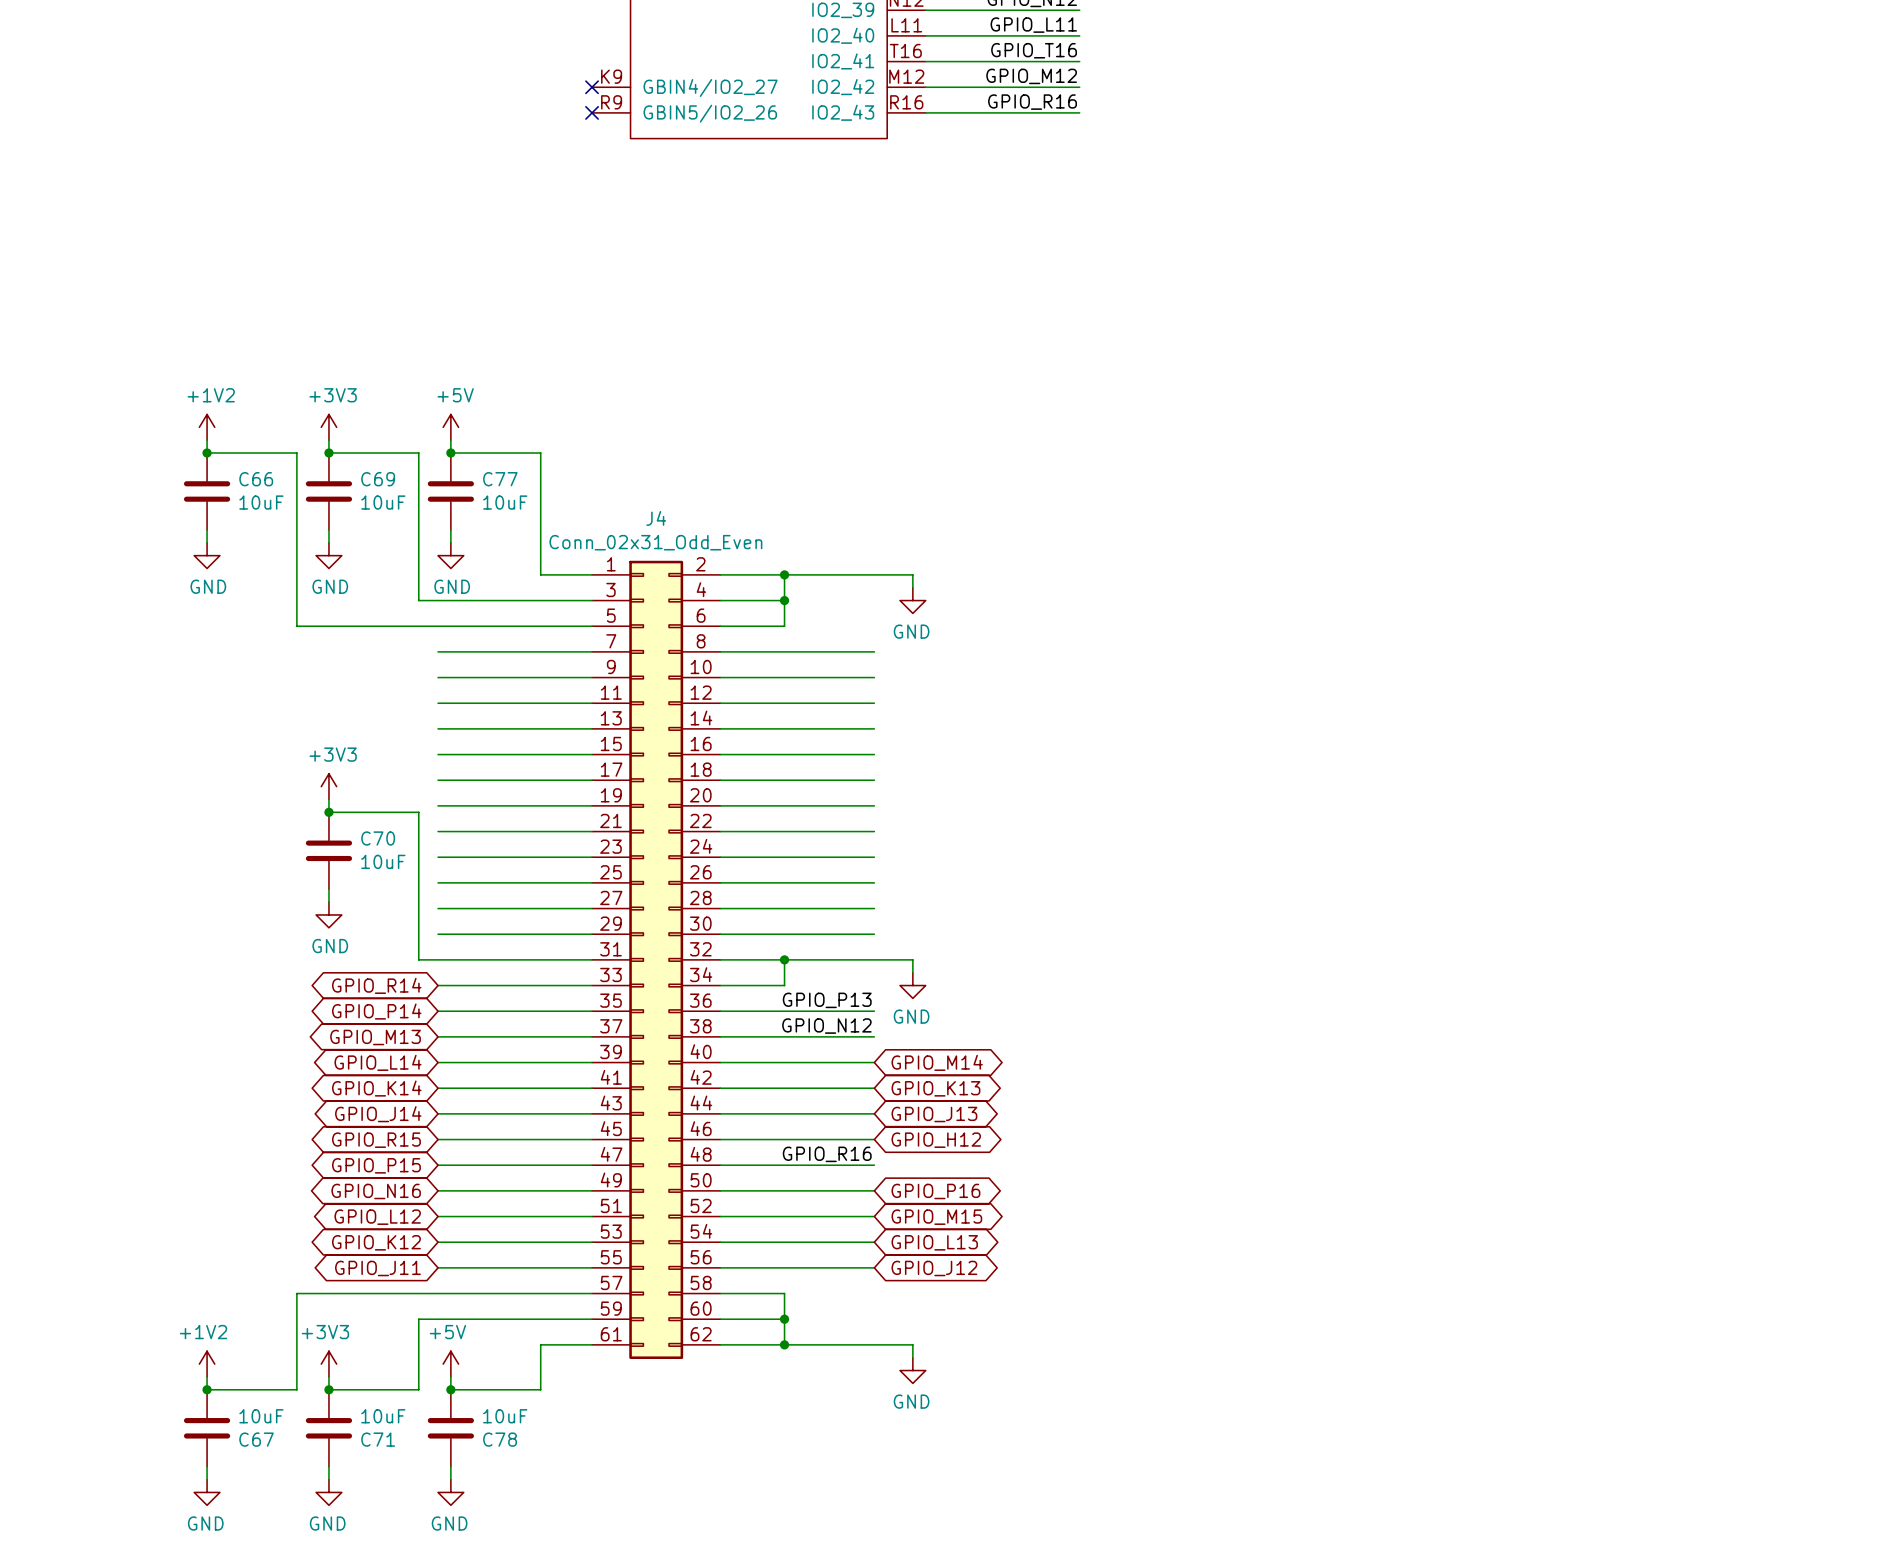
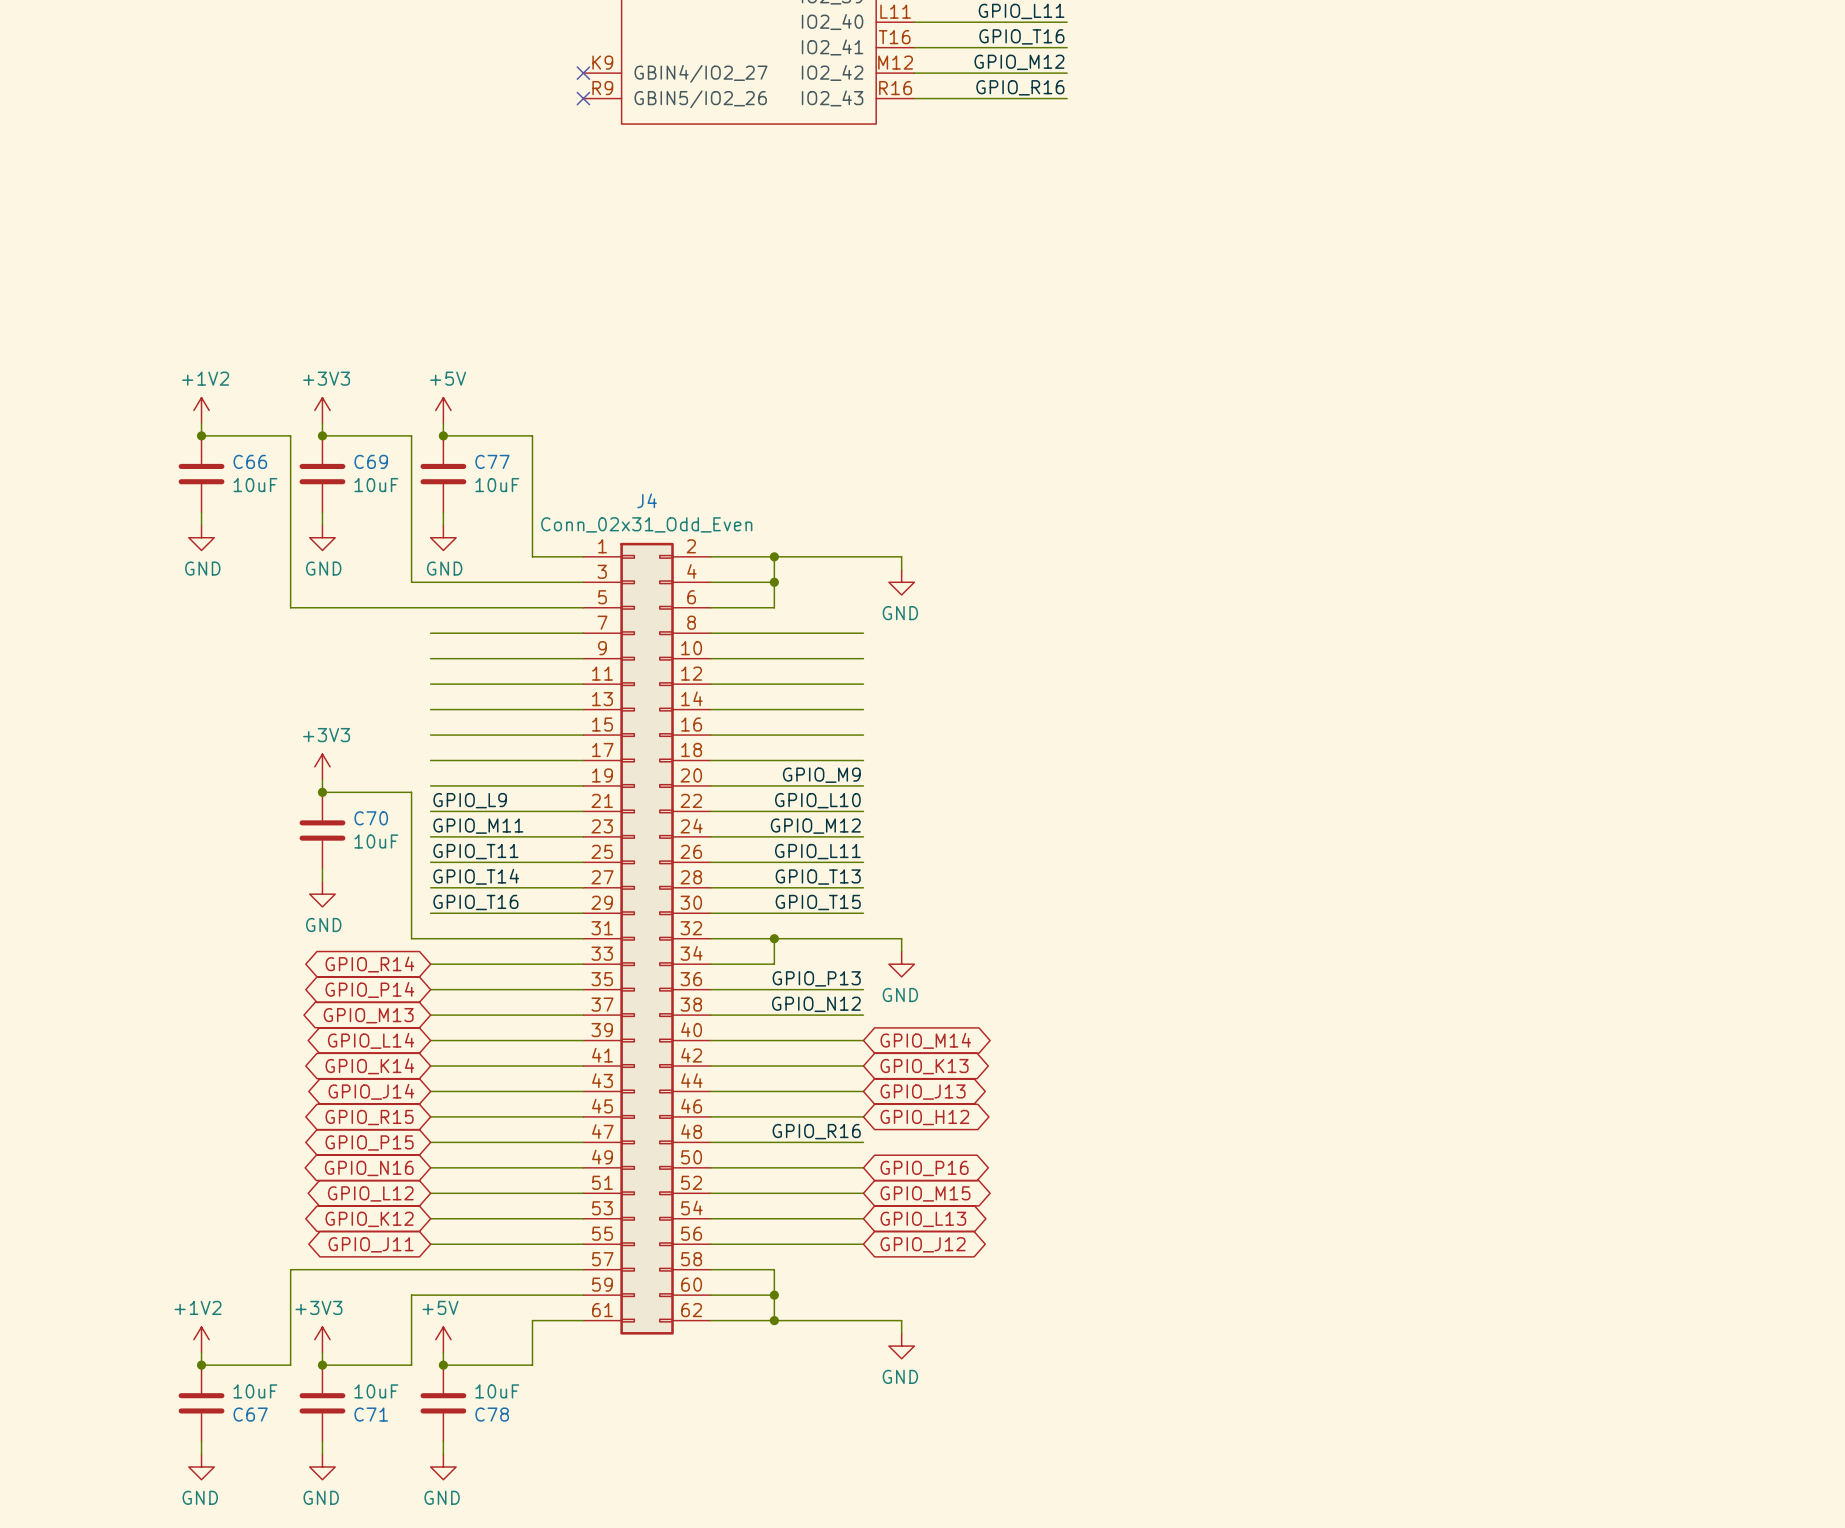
label: none -> GPIO_M9 (821, 775)
label: none -> GPIO_L9 (470, 800)
label: none -> GPIO_L10 (817, 800)
label: none -> GPIO_M11 (478, 826)
label: none -> GPIO_M12 (815, 826)
label: none -> GPIO_T11 (475, 851)
label: none -> GPIO_L11 (817, 851)
label: none -> GPIO_T14 (476, 876)
label: none -> GPIO_T13 (818, 877)
label: none -> GPIO_T16 (475, 902)
label: none -> GPIO_T15 (818, 902)

